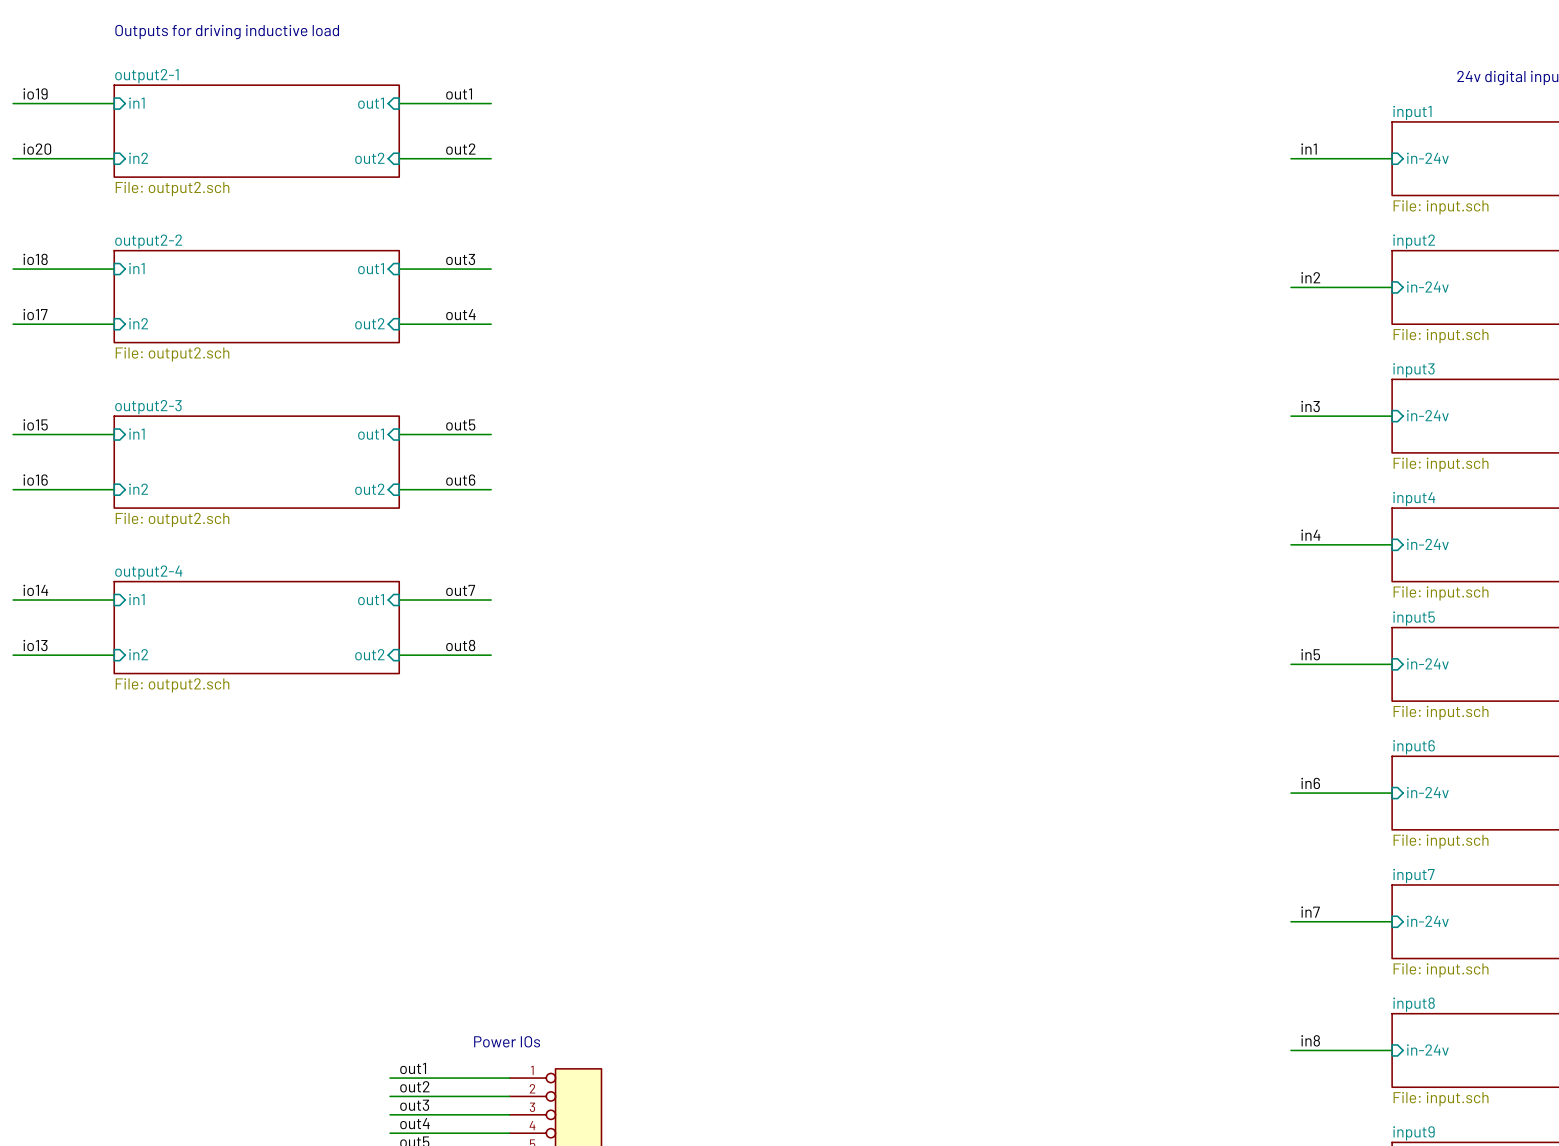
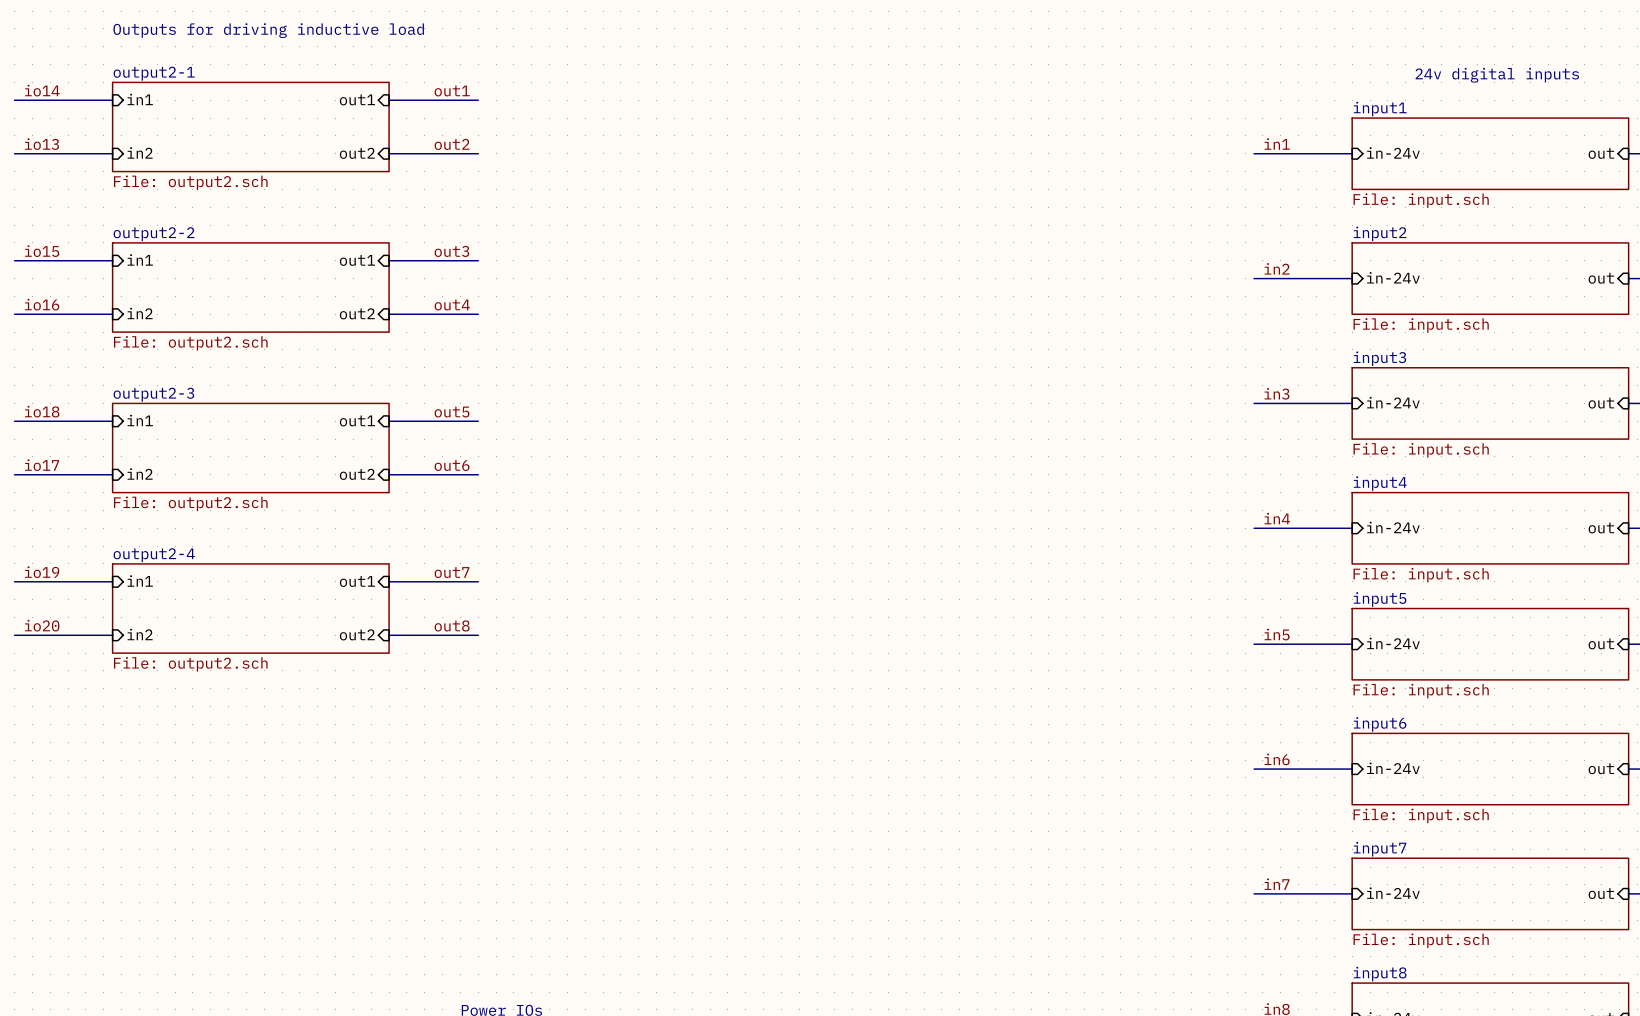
label: io19 (35, 93) -> io14 (42, 90)
label: io20 (37, 149) -> io13 (42, 144)
label: io18 (35, 259) -> io15 (42, 251)
label: io17 (35, 314) -> io16 (42, 304)
label: io15 (35, 424) -> io18 (42, 411)
label: io16 (35, 480) -> io17 (42, 465)
label: io14 (35, 590) -> io19 (42, 572)
label: io13 (35, 645) -> io20 (42, 625)

